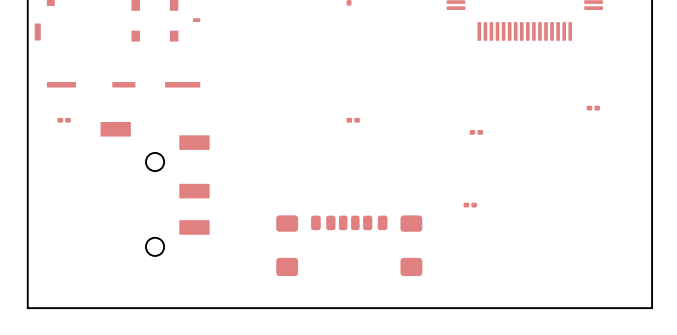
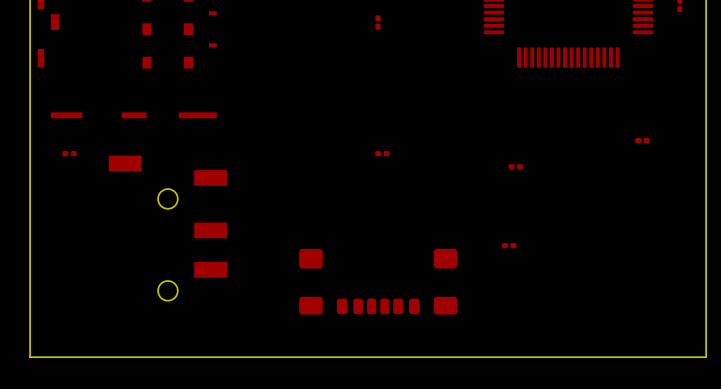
part rotation: 0° (349, 245) -> 180° (378, 281)

